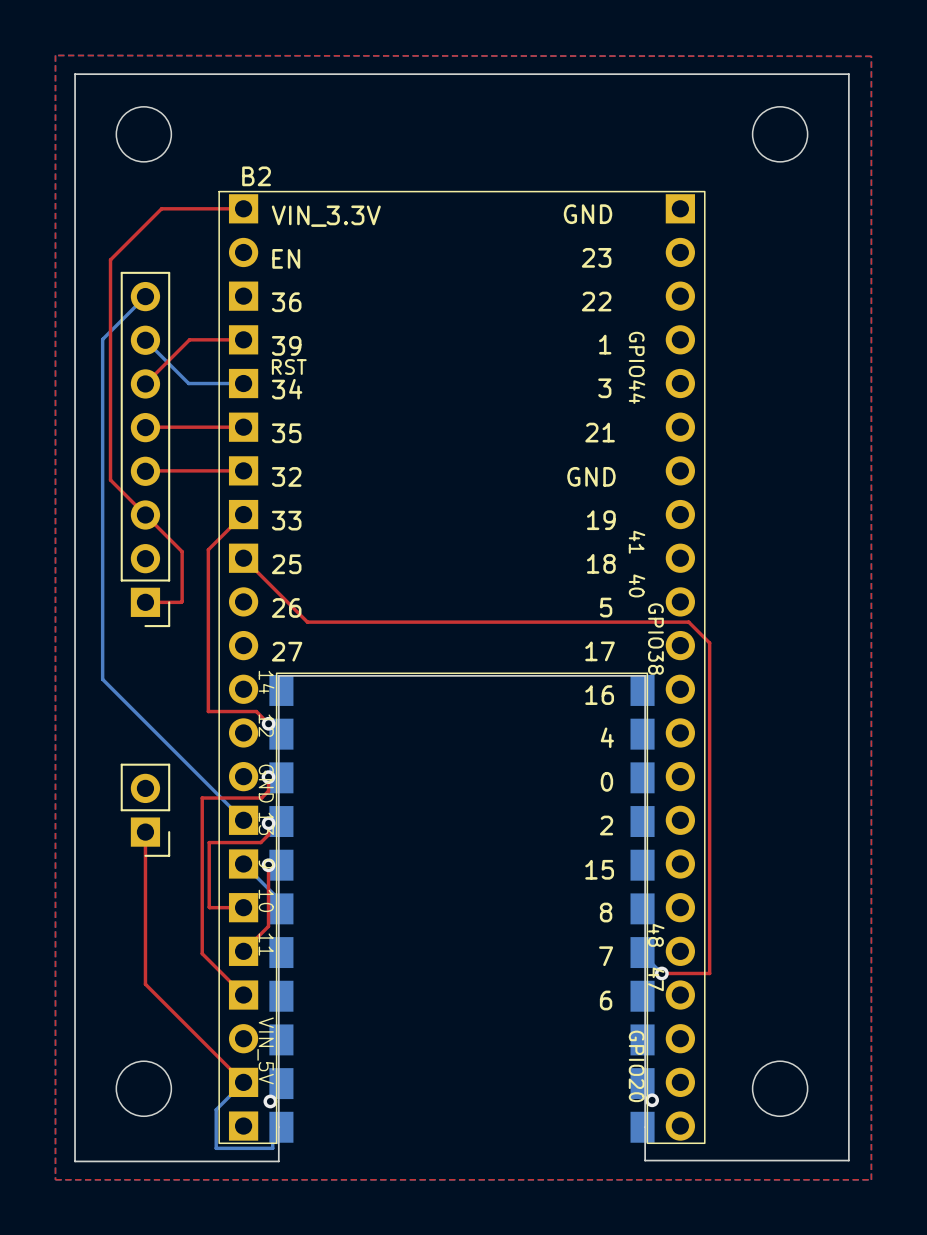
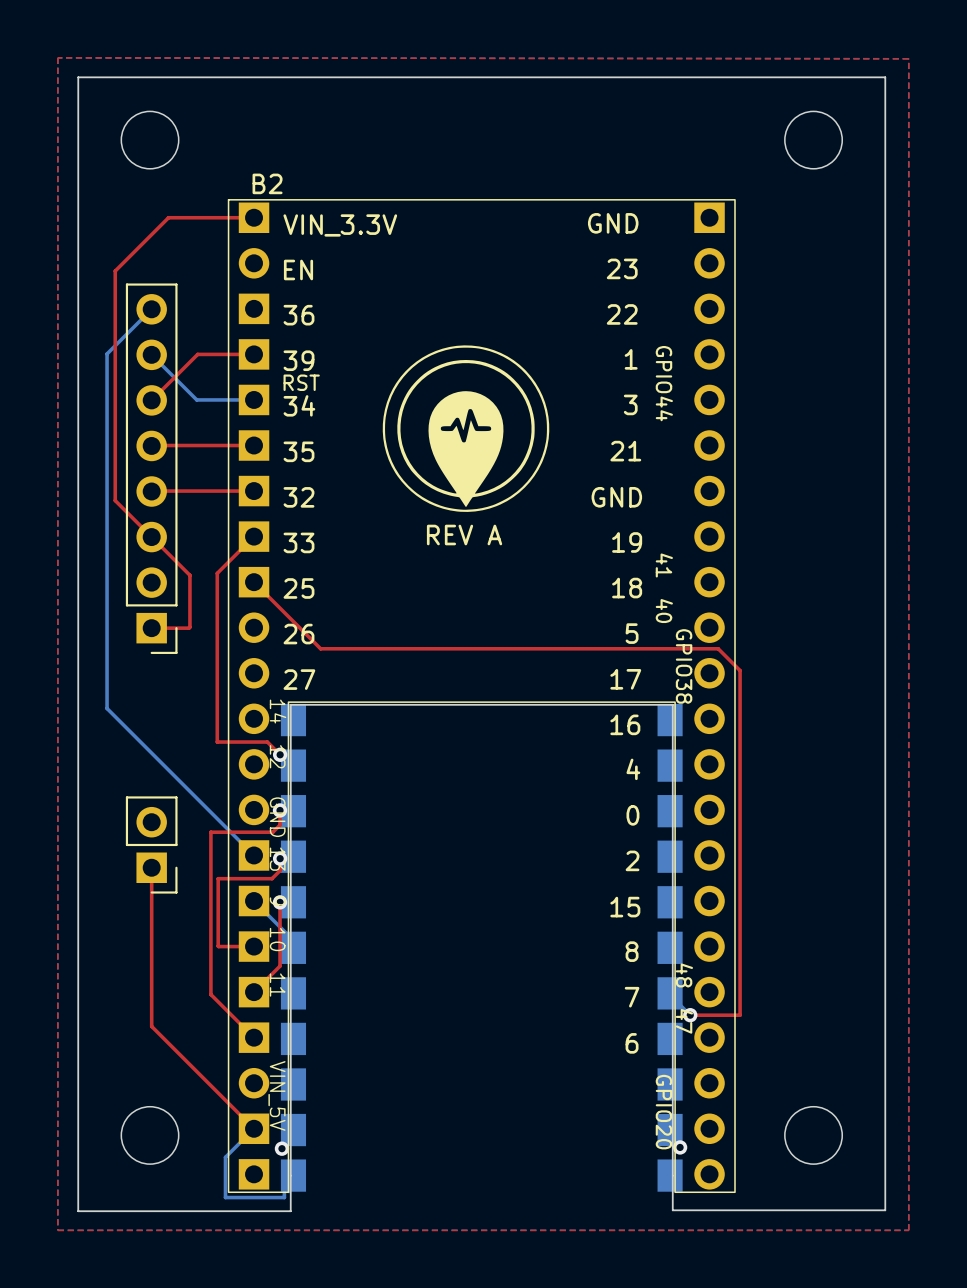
drawing: none -> [382, 345, 550, 512]
text: none -> REV A (464, 535)

